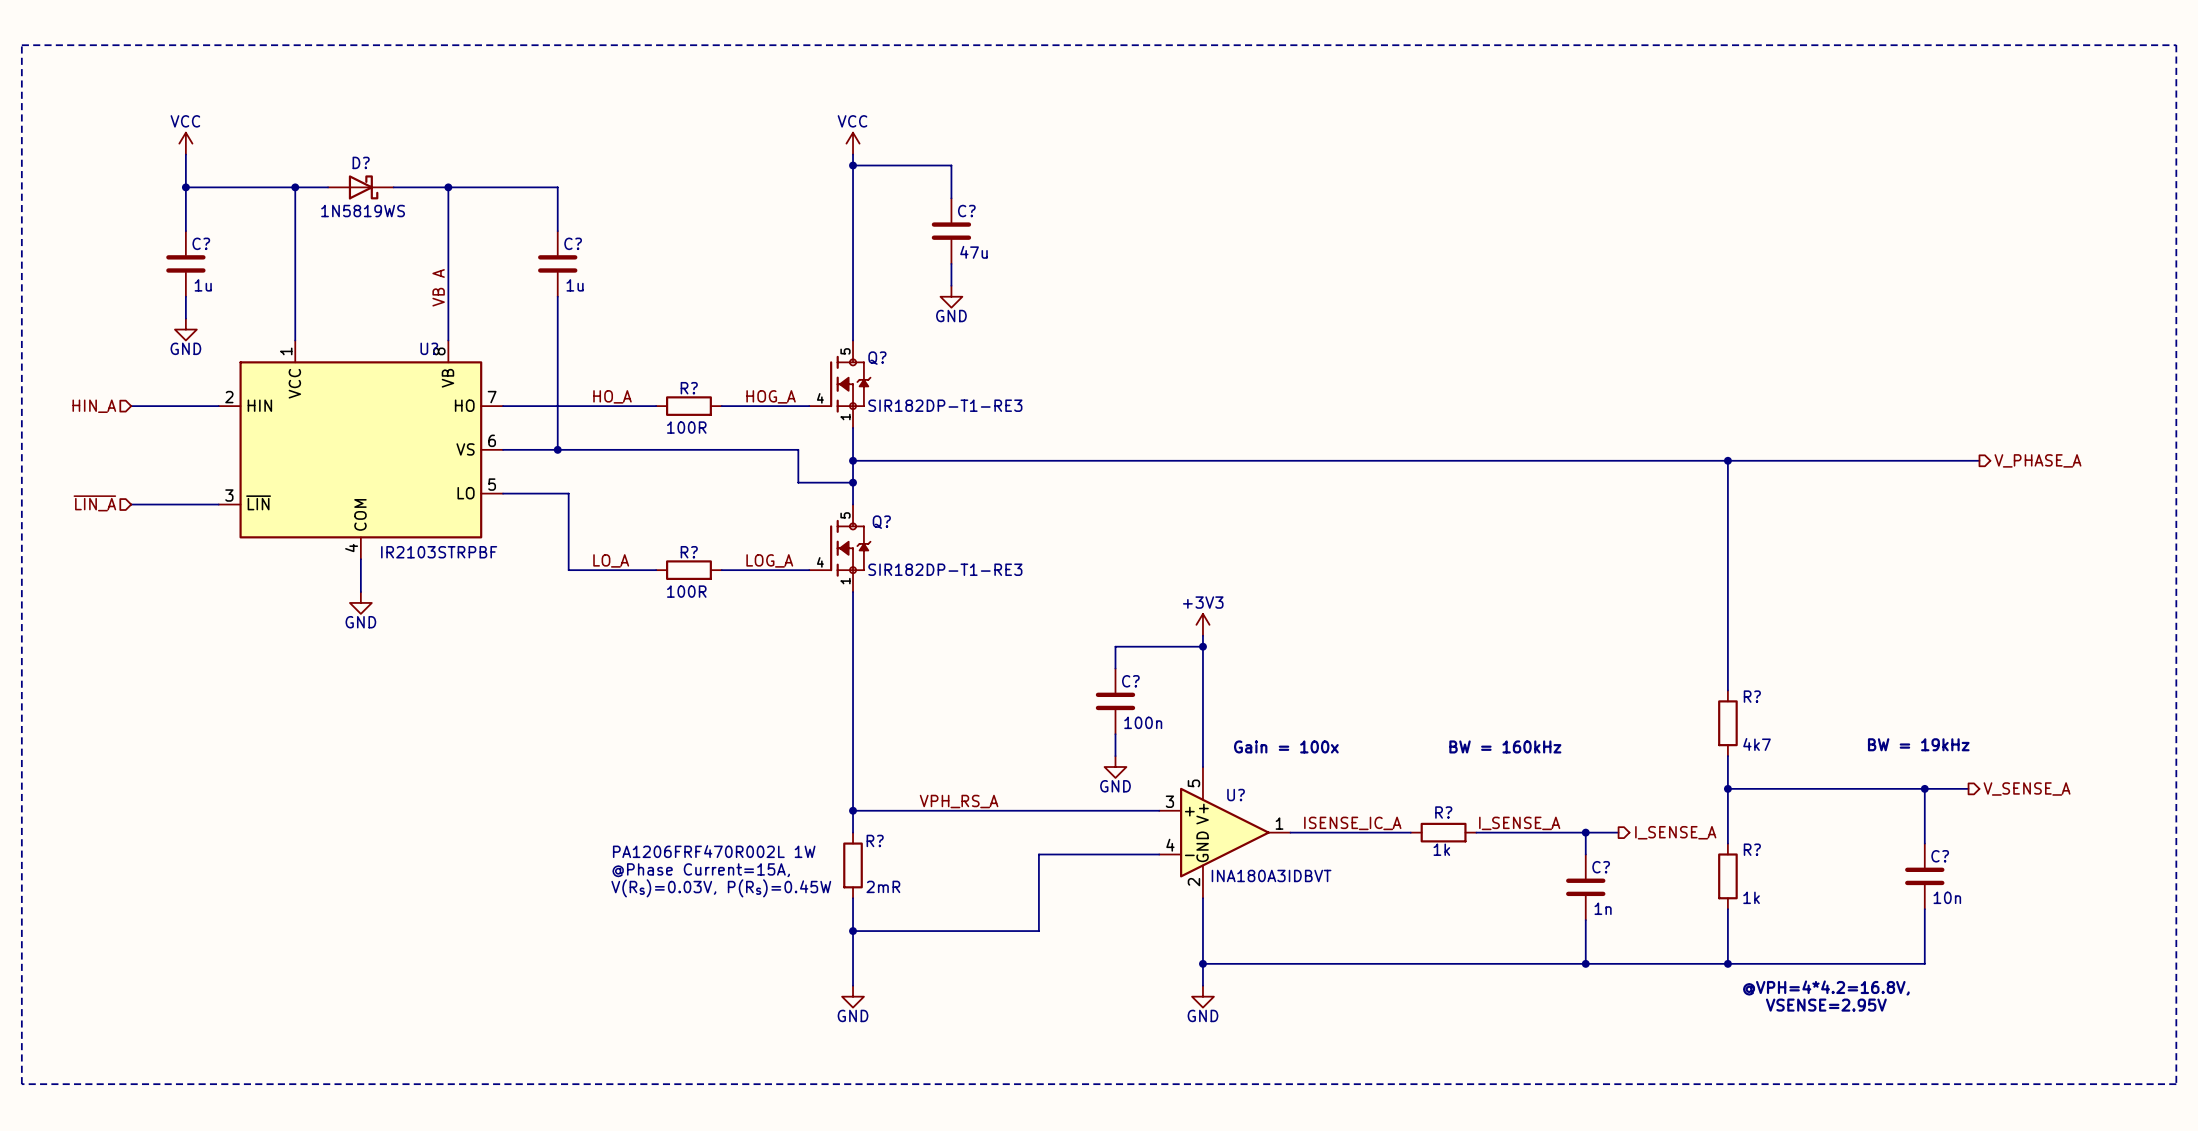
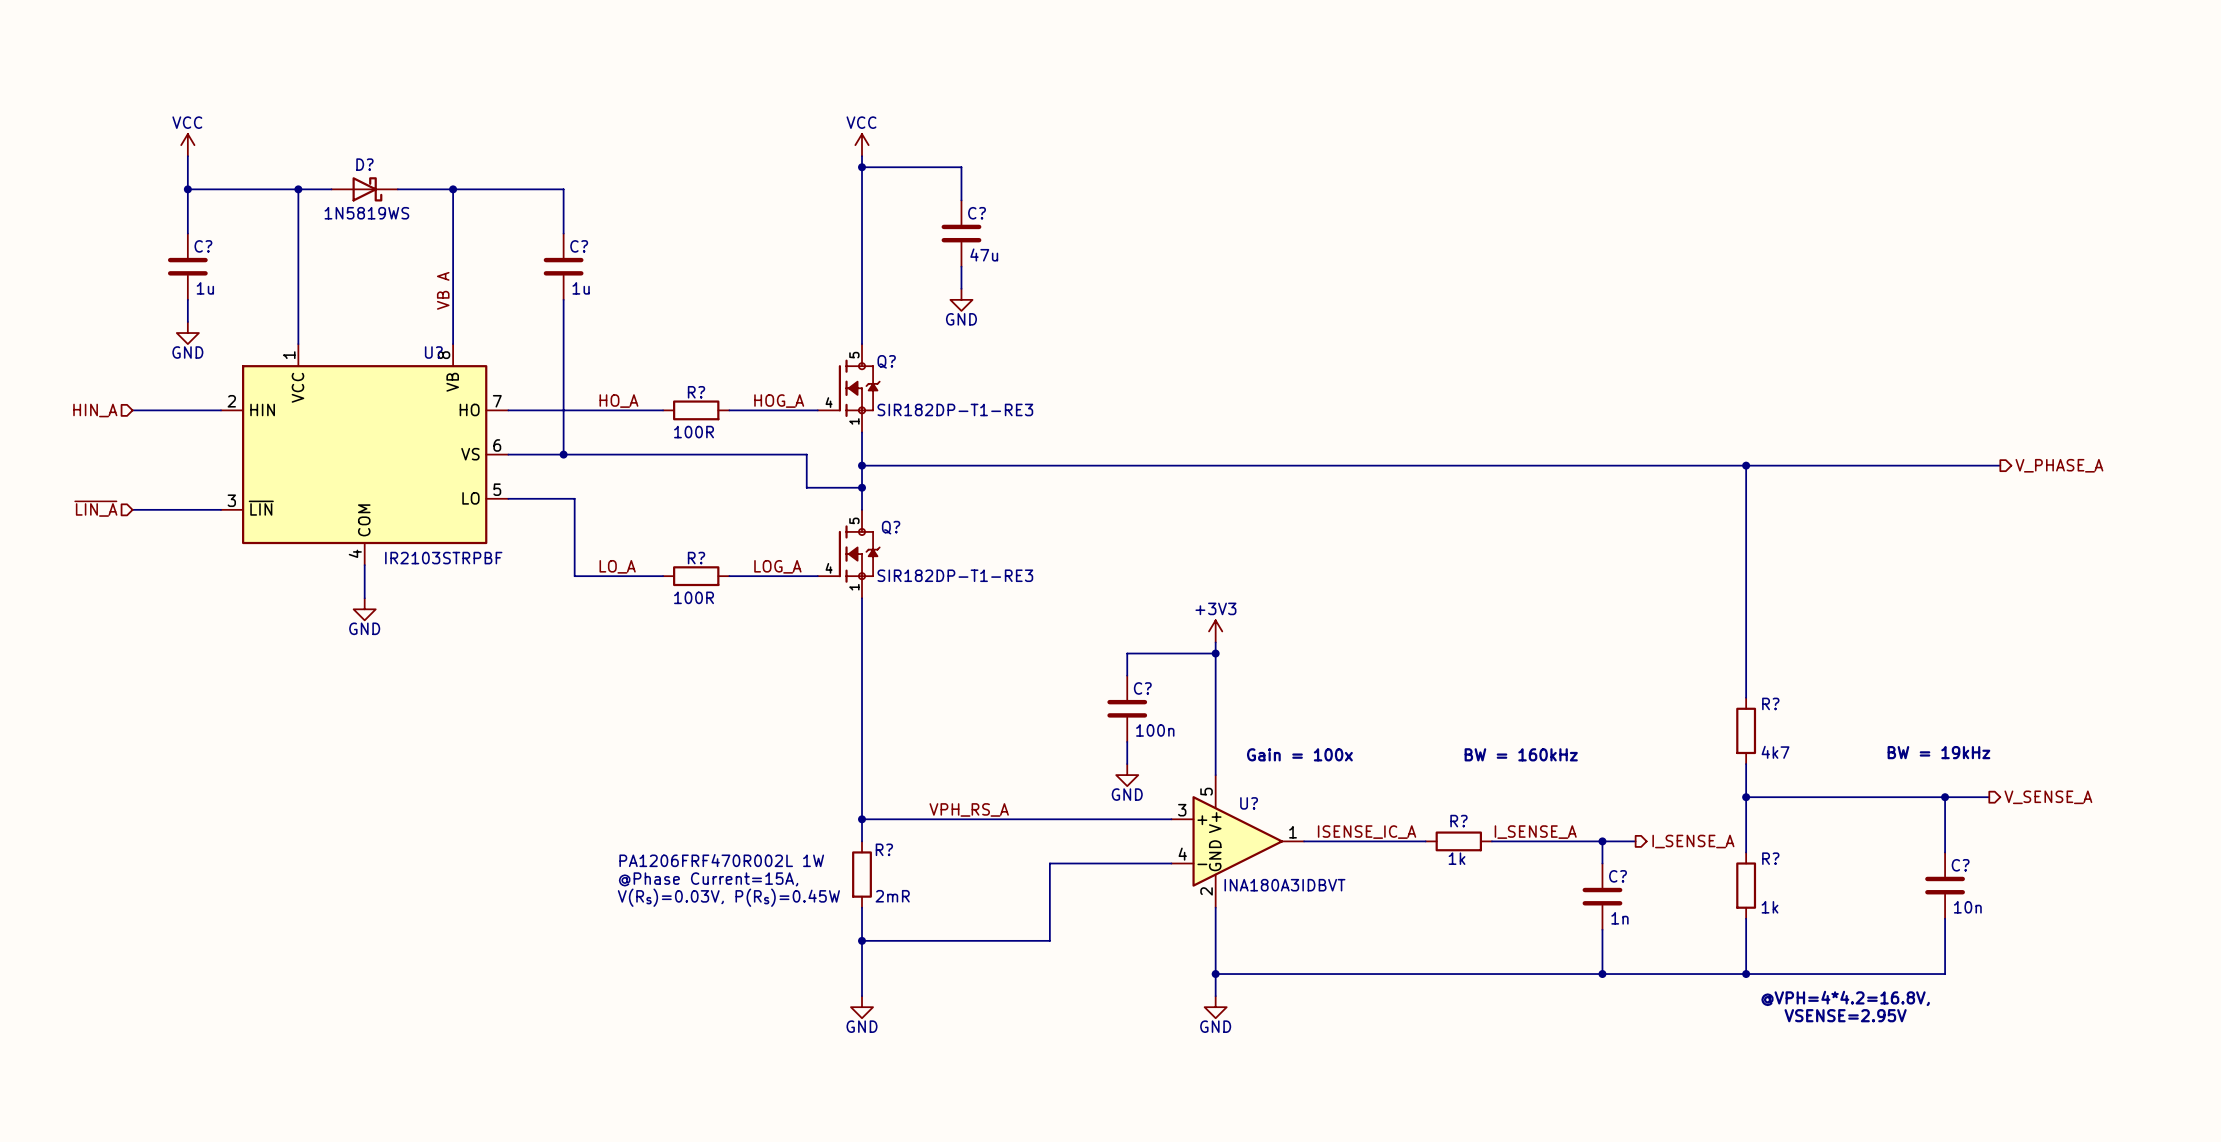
line: (21, 45) (2176, 45) (2176, 1084) (21, 1084) (21, 45) -> none

